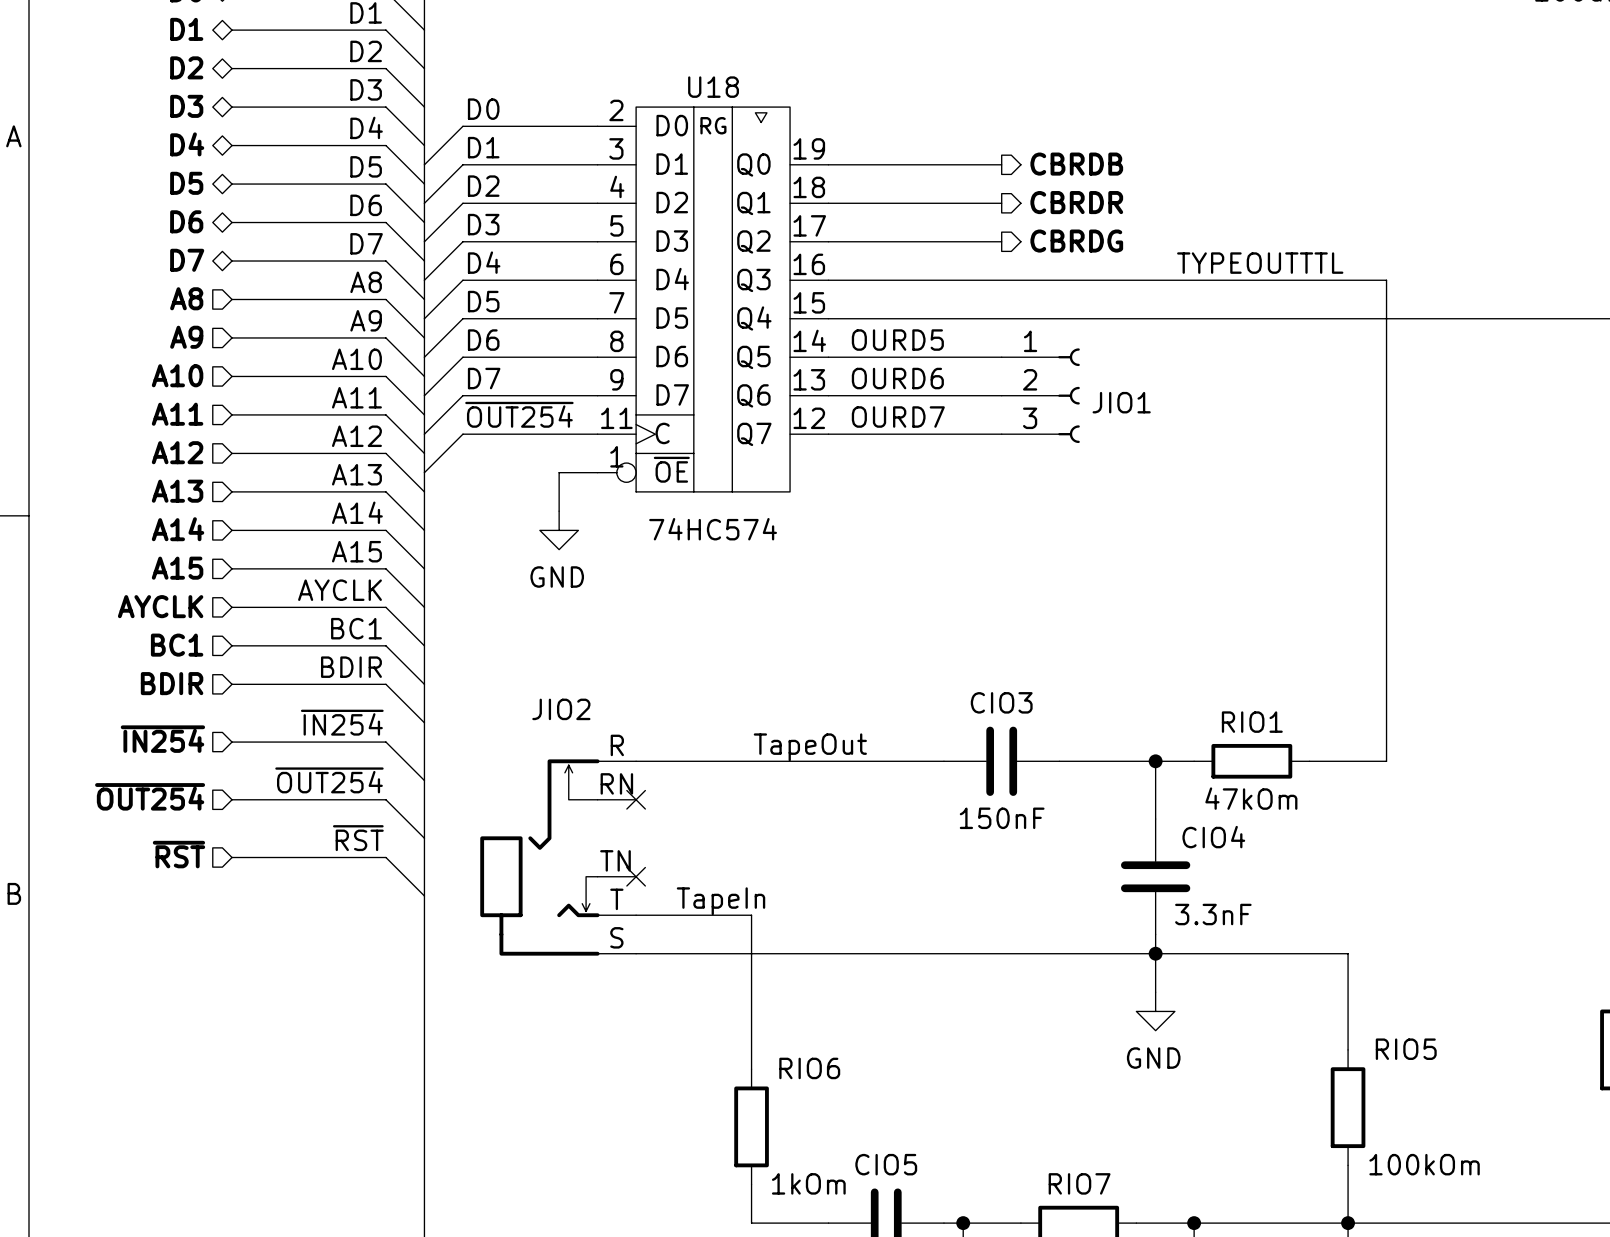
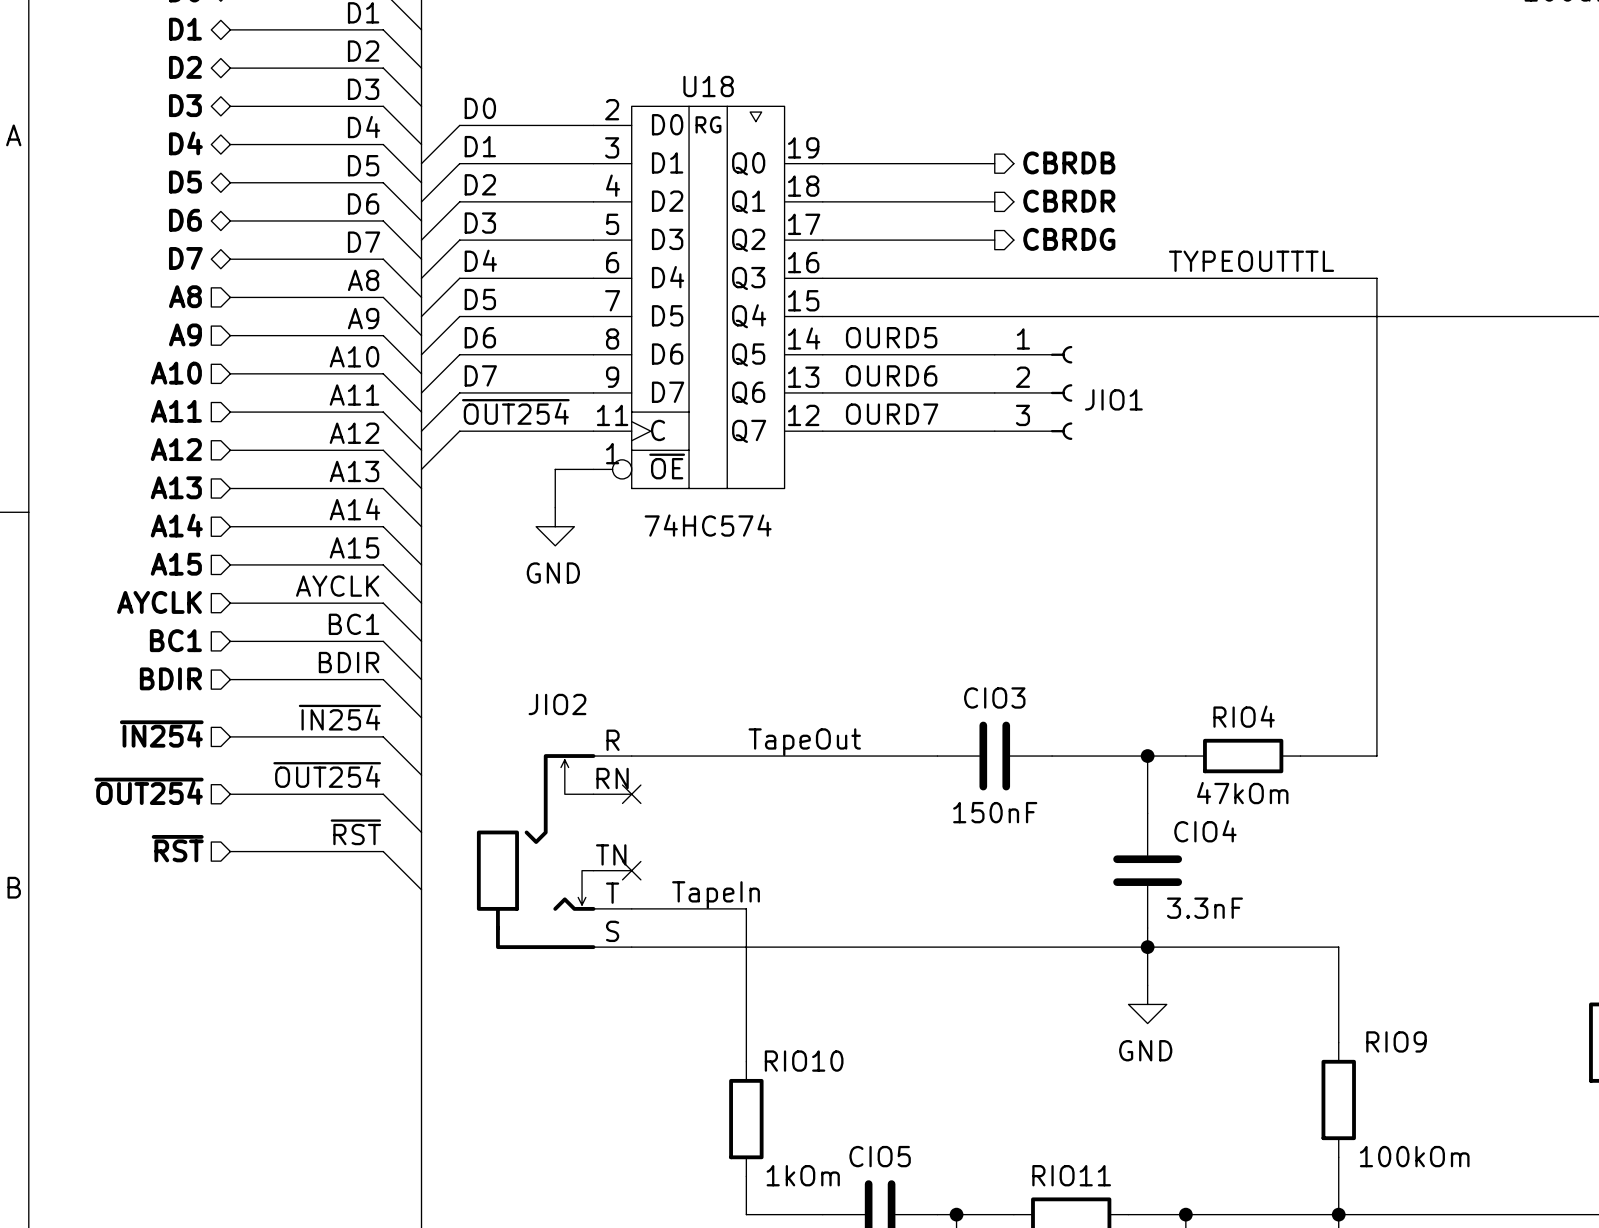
RIO1 name: RIO1 (1252, 722) -> RIO4 (1244, 716)
RIO5 name: RIO5 (1406, 1049) -> RIO9 (1396, 1041)
RIO6 name: RIO6 (809, 1068) -> RIO10 (804, 1061)
RIO7 name: RIO7 (1079, 1183) -> RIO11 (1071, 1175)

